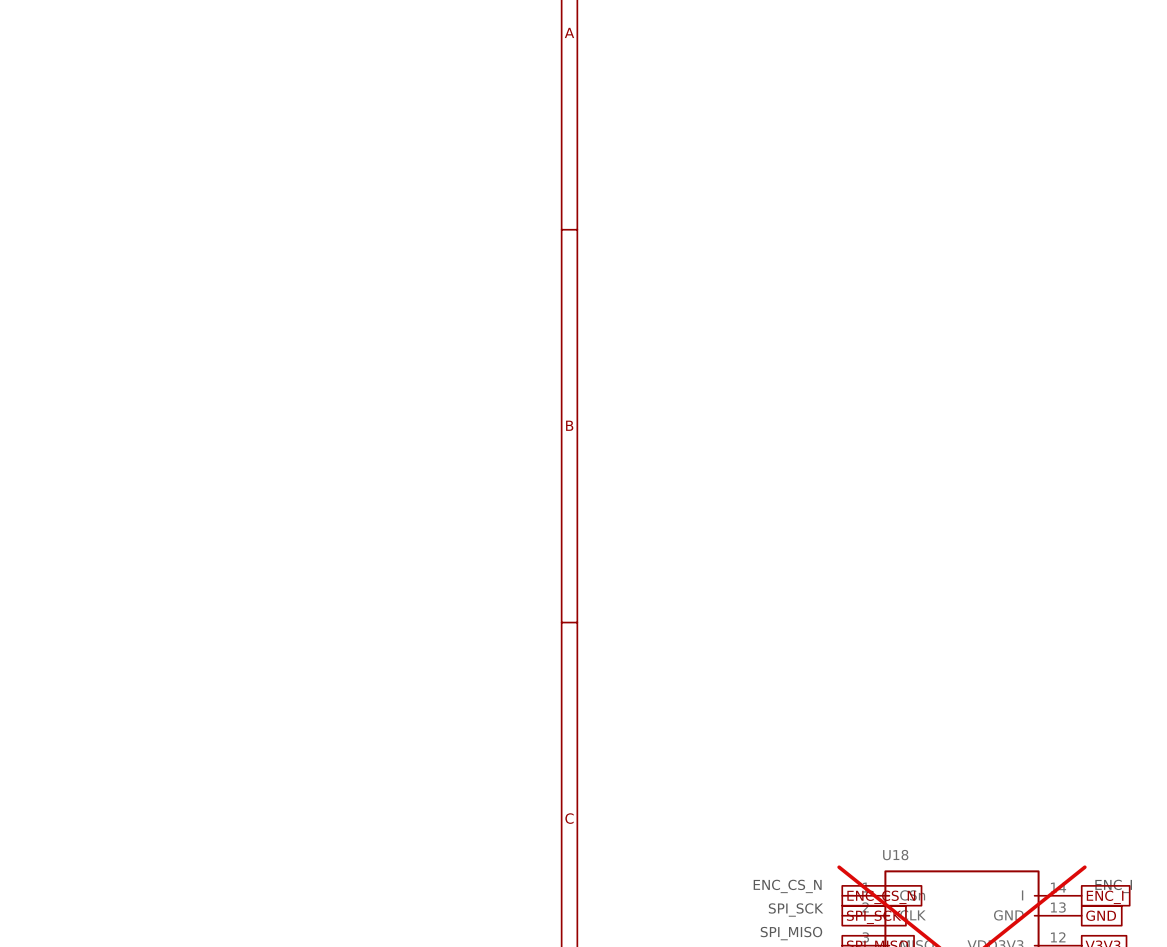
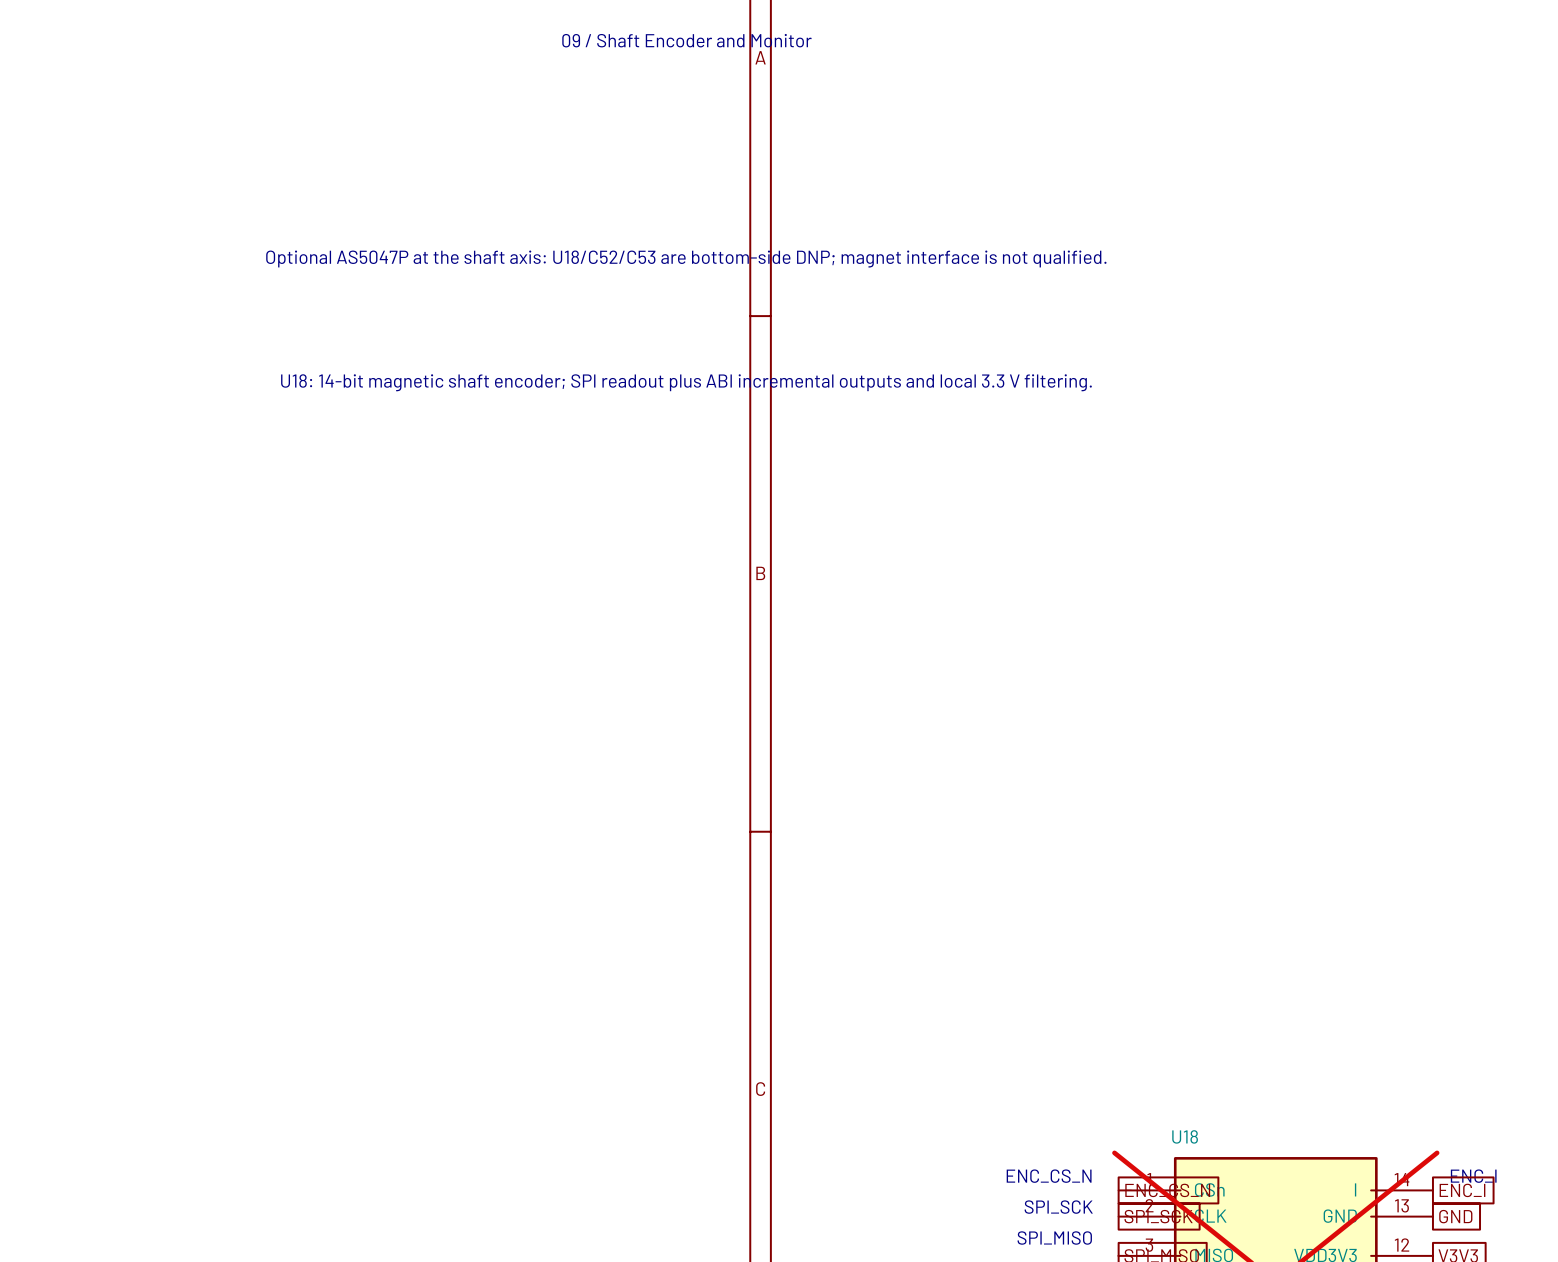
text: none -> 09 / Shaft Encoder and Monitor (686, 40)
text: none -> Optional AS5047P at the shaft axis: U18/C52/C53 are bottom-side DNP; magnet interface is not qualified. (686, 259)
text: none -> U18: 14-bit magnetic shaft encoder; SPI readout plus ABI incremental outputs and local 3.3 V filtering. (686, 382)

